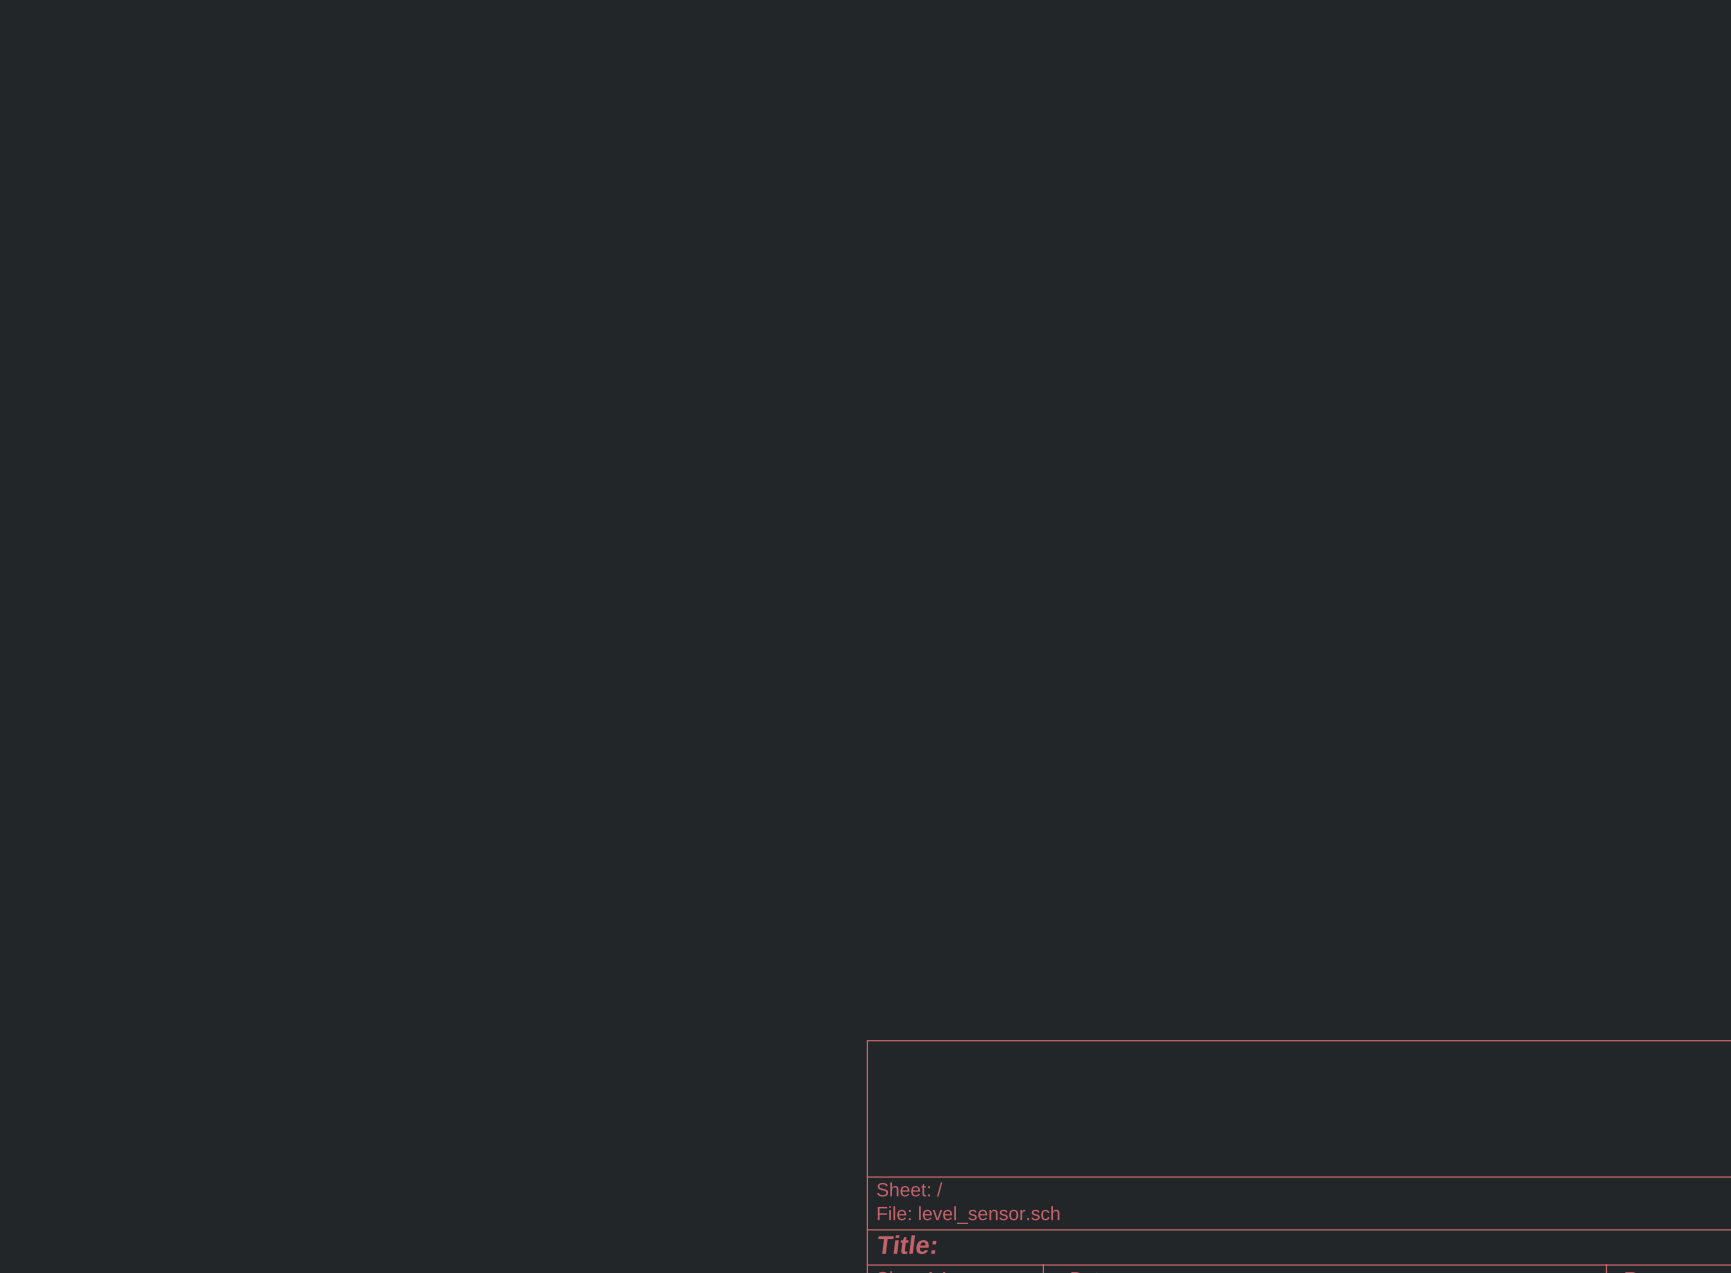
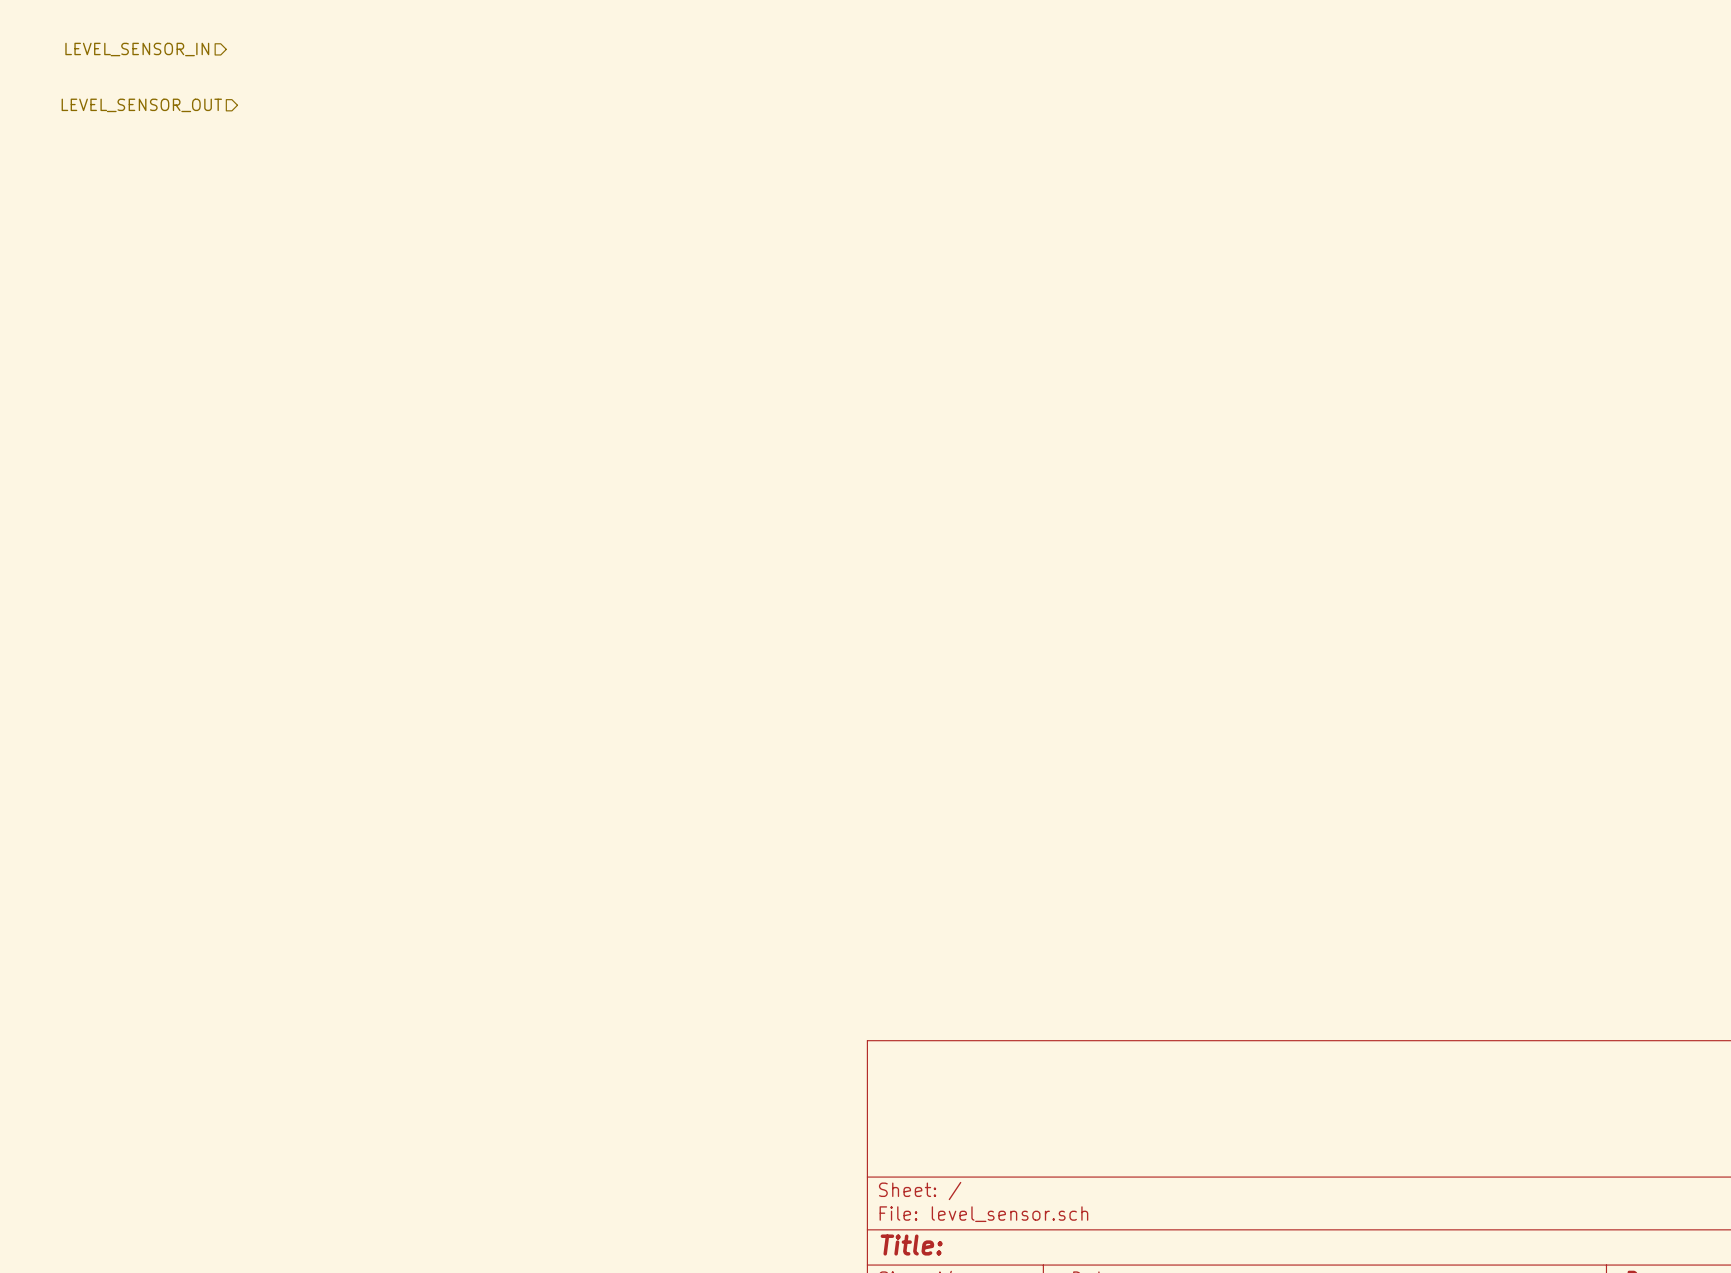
hierarchical label: none -> LEVEL_SENSOR_IN (137, 49)
hierarchical label: none -> LEVEL_SENSOR_OUT (141, 105)

